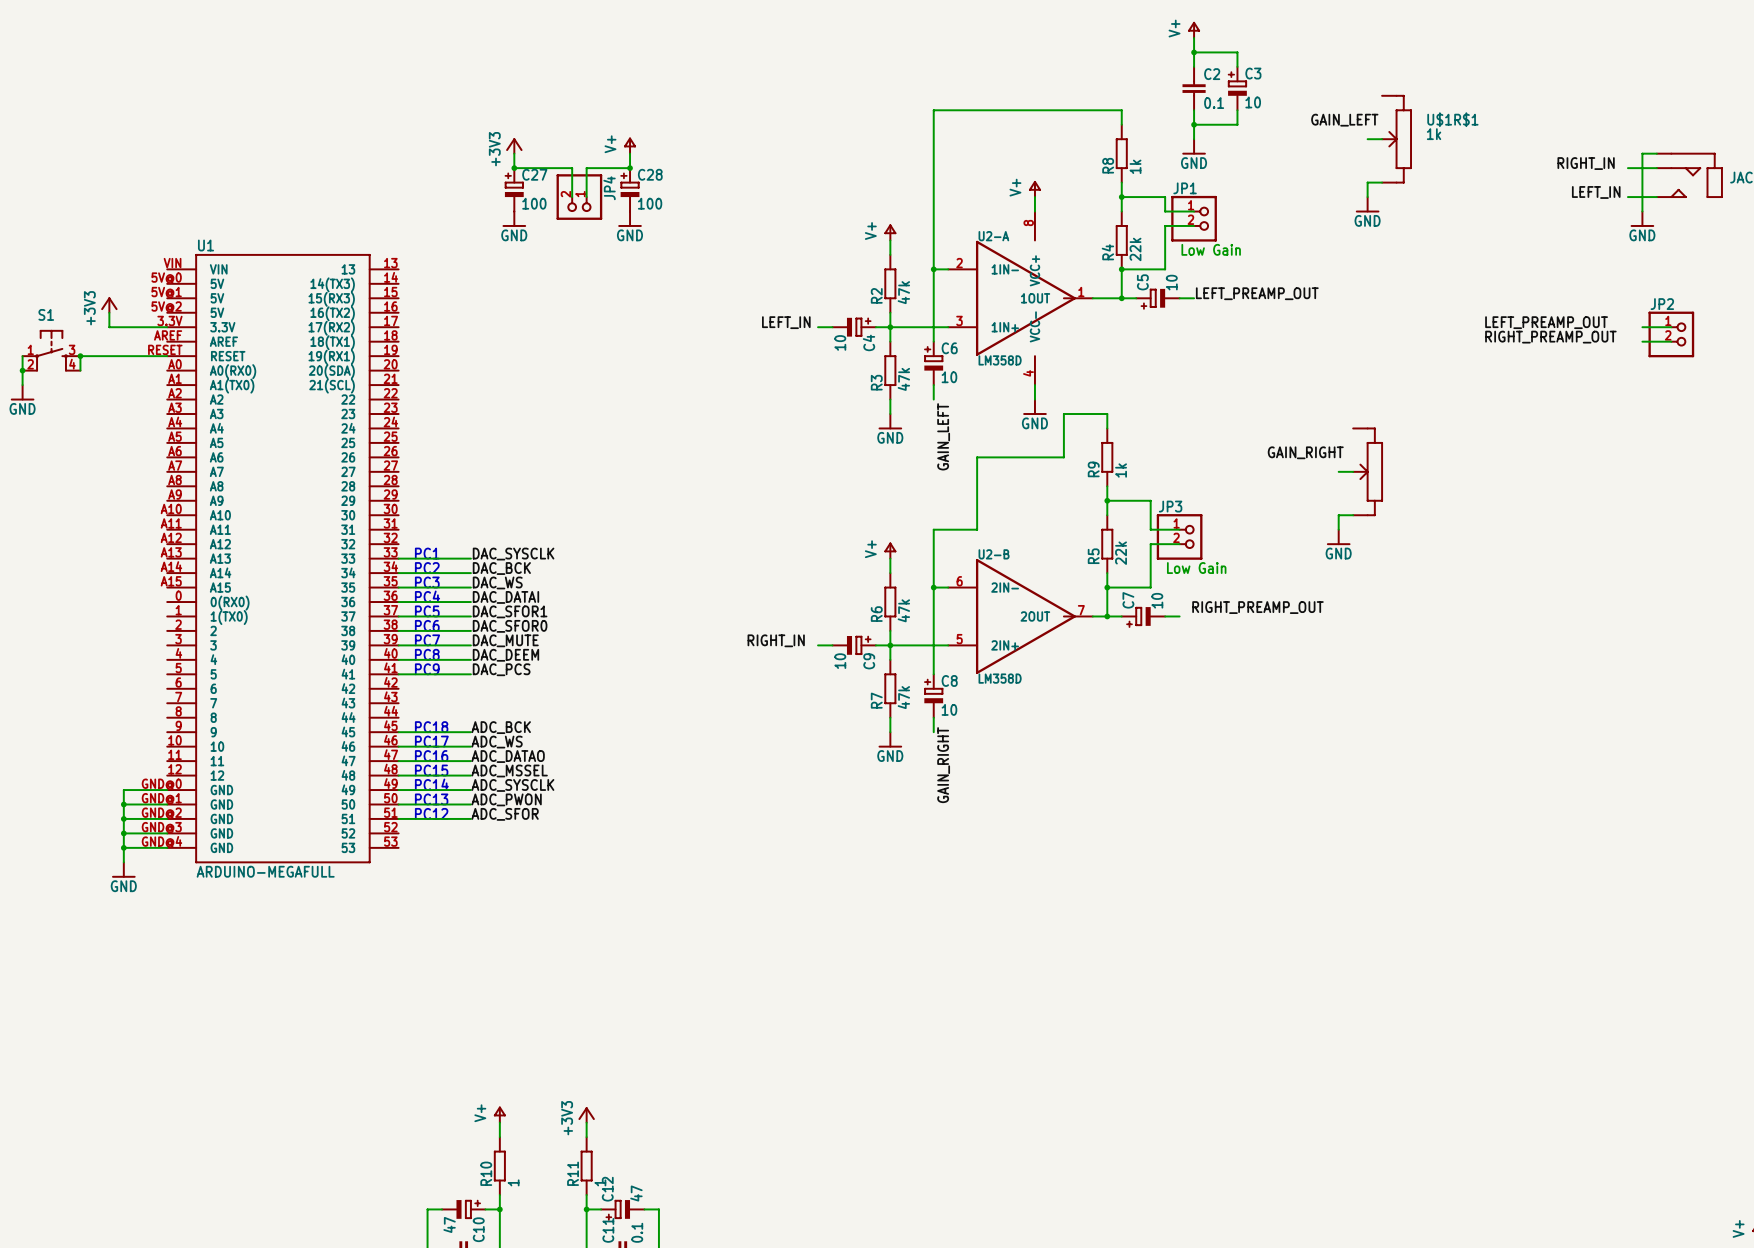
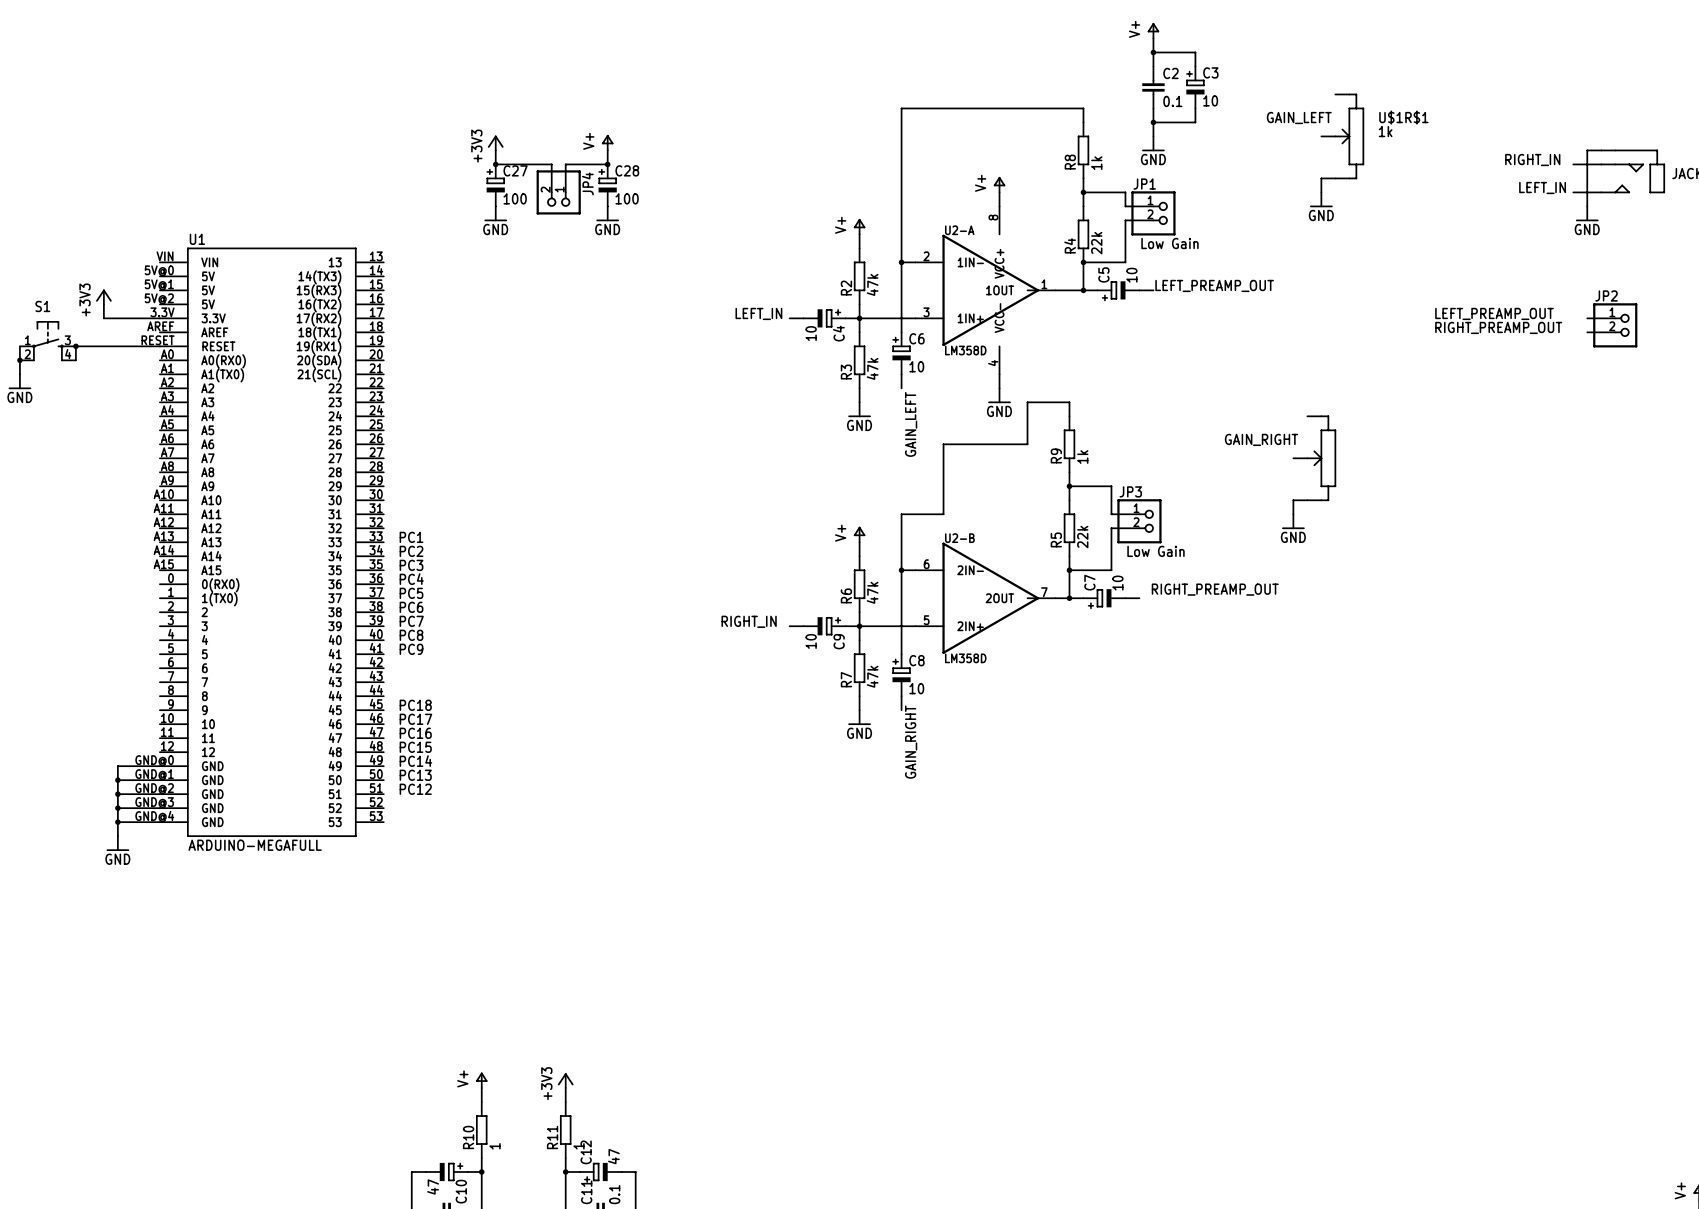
label: DAC_SYSCLK (513, 554) -> none
wire: (398, 558) (470, 558) -> none
label: DAC_BCK (501, 568) -> none
wire: (398, 573) (470, 573) -> none
label: DAC_WS (497, 582) -> none
wire: (398, 587) (470, 587) -> none
label: DAC_DATAI (505, 597) -> none
wire: (398, 602) (470, 602) -> none
label: DAC_SFOR1 (510, 611) -> none
wire: (398, 616) (470, 616) -> none
label: DAC_SFOR0 (510, 626) -> none
wire: (398, 630) (470, 630) -> none
label: DAC_MUTE (505, 640) -> none
wire: (398, 645) (470, 645) -> none
label: DAC_DEEM (505, 655) -> none
wire: (398, 659) (470, 659) -> none
label: DAC_PCS (501, 669) -> none
wire: (398, 674) (470, 674) -> none
label: ADC_BCK (501, 727) -> none
wire: (398, 732) (470, 732) -> none
label: ADC_WS (497, 742) -> none
wire: (398, 746) (470, 746) -> none
label: ADC_DATAO (508, 756) -> none
wire: (398, 761) (470, 761) -> none
label: ADC_MSSEL (509, 770) -> none
wire: (398, 775) (470, 775) -> none
label: ADC_SYSCLK (512, 785) -> none
wire: (398, 790) (470, 790) -> none
label: ADC_PWON (506, 799) -> none
wire: (398, 804) (470, 804) -> none
label: ADC_SFOR (505, 814) -> none
wire: (398, 818) (470, 818) -> none

